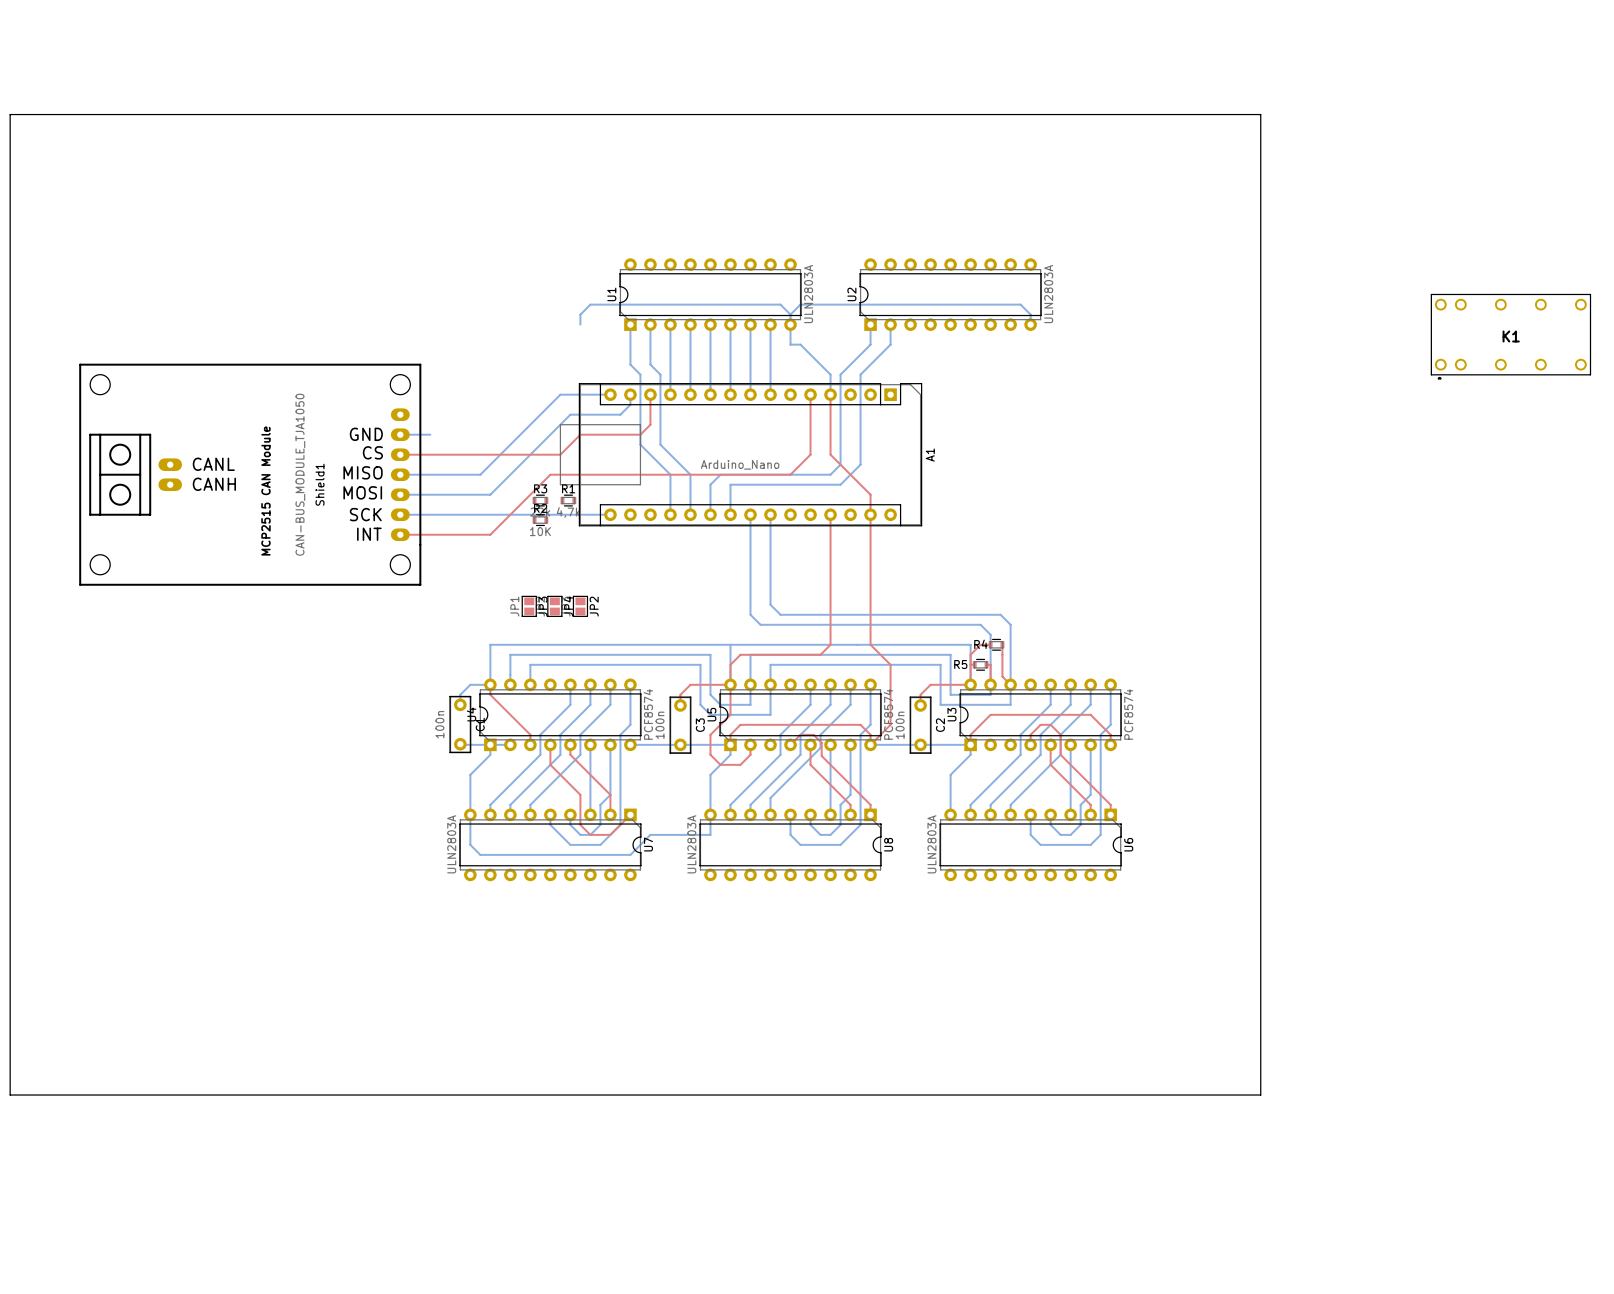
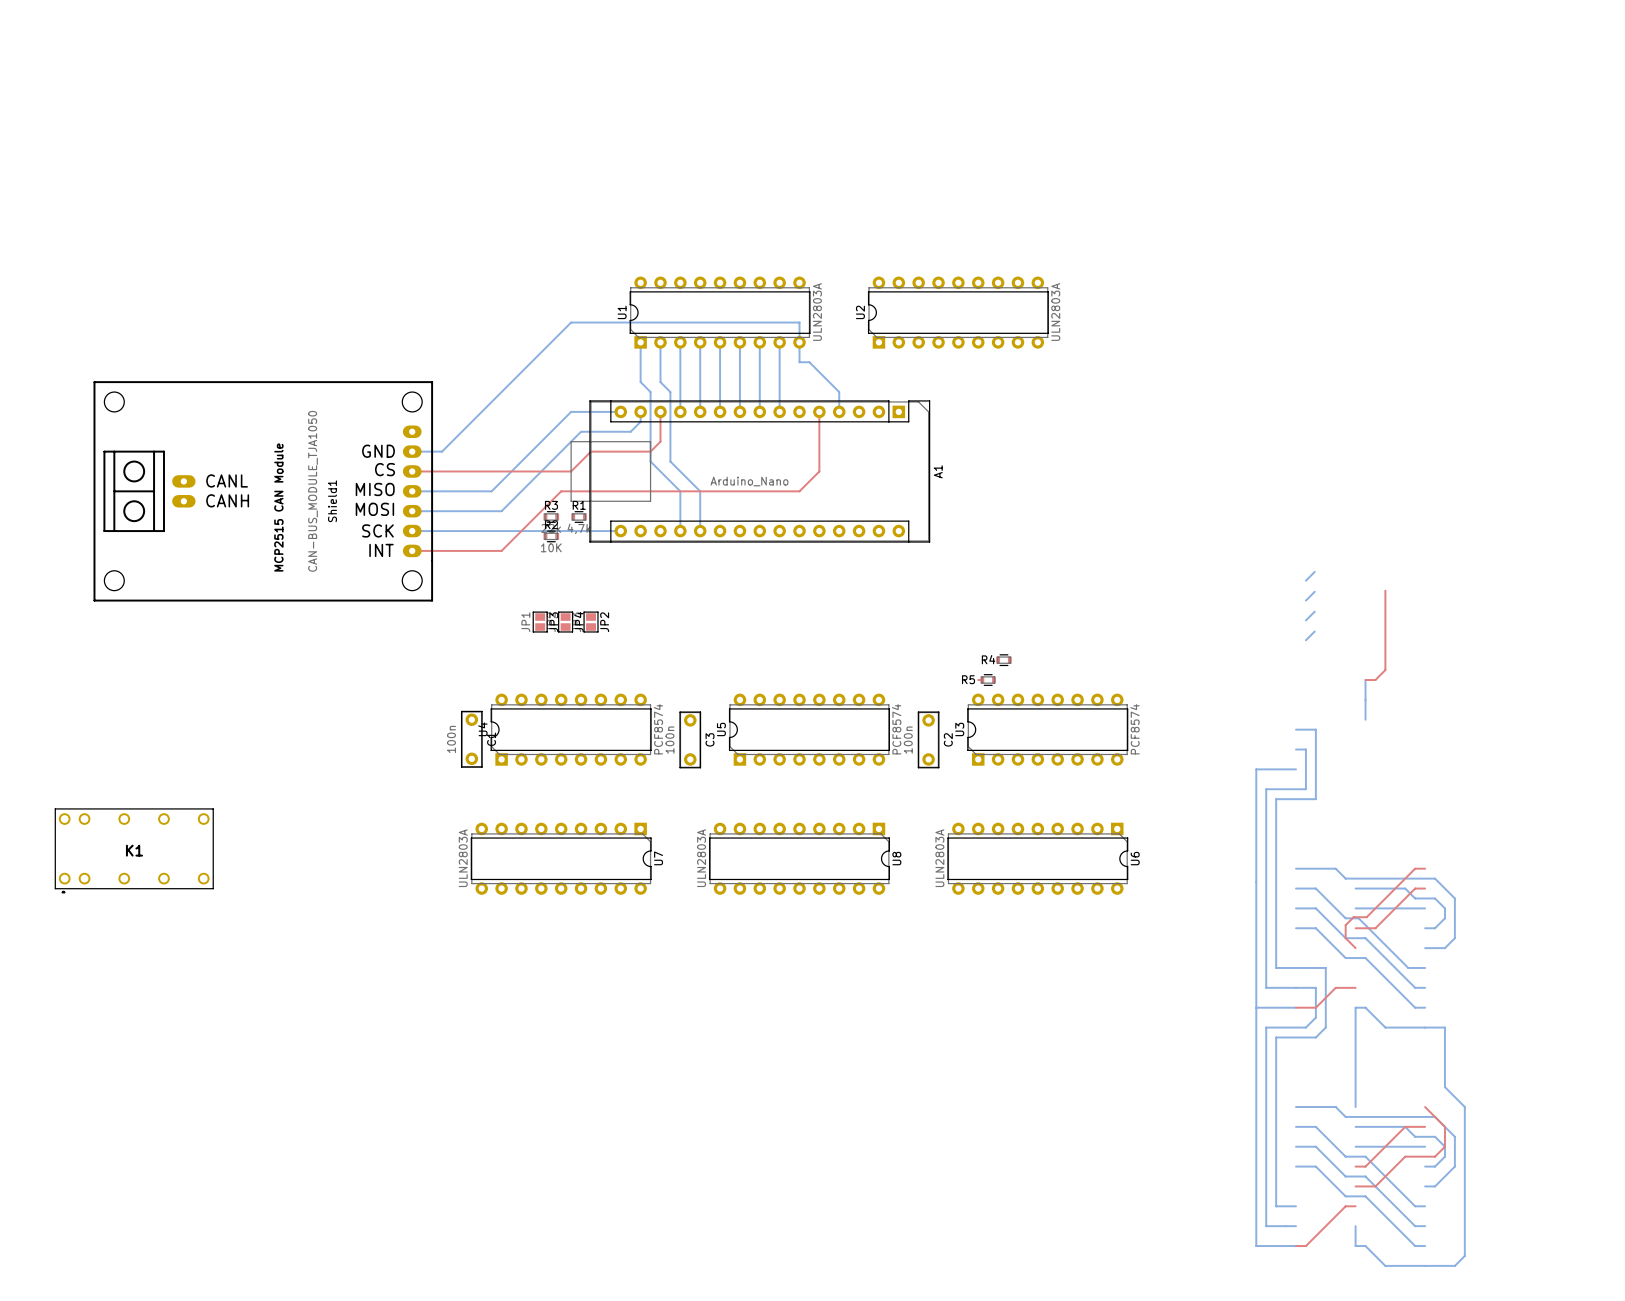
board edge: (10, 114) (10, 1095) (1260, 1095) (1260, 114) (10, 114) -> none
bottom track: (590, 304) (580, 314) (580, 324) -> (600, 322) (571, 322) (442, 451)
bottom track: (780, 304) (790, 314) (800, 304) (1020, 304) (1030, 314) (1030, 324) -> (789, 322) (799, 322) (799, 332)
bottom track: (870, 324) (870, 344) (840, 374) (840, 464) (830, 474) (720, 474) (710, 484) (710, 514) -> none
bottom track: (890, 324) (890, 344) (860, 374) (860, 464) (840, 484) (730, 484) (730, 514) -> none
K1 position: (1510, 336) -> (134, 851)
top track: (830, 394) (830, 454) (870, 494) (870, 644) (890, 664) (890, 724) (870, 744) (870, 734) (860, 724) (740, 724) (730, 734) (730, 744) -> none
bottom track: (750, 514) (750, 614) (760, 624) (980, 624) (990, 634) (990, 694) (950, 694) (950, 654) (750, 654) (750, 704) (720, 704) (710, 694) (710, 654) (510, 654) (510, 684) -> none
bottom track: (770, 514) (770, 604) (780, 614) (1000, 614) (1010, 624) (1010, 704) (940, 704) (940, 664) (770, 664) (770, 714) (710, 714) (700, 704) (700, 664) (530, 664) (530, 684) -> none
top track: (830, 514) (830, 644) (820, 654) (740, 654) (730, 664) (730, 714) (710, 734) (710, 754) (720, 764) (740, 764) (750, 754) (750, 744) -> none
bottom track: none -> (1314, 571) (1305, 580)
top track: none -> (1385, 590) (1385, 670) (1375, 680) (1365, 680)
bottom track: none -> (1314, 591) (1305, 600)
bottom track: none -> (1314, 611) (1305, 620)
bottom track: none -> (1314, 631) (1305, 640)
bottom track: (730, 644) (730, 684) -> none
top track: (990, 644) (980, 644) (970, 654) (970, 684) (930, 684) (920, 694) (920, 705) -> none
top track: (1002, 644) (1002, 676) (1010, 684) -> none
top track: (986, 664) (990, 664) (990, 684) -> none
bottom track: none -> (1365, 680) (1365, 719)
top track: (490, 684) (490, 694) (530, 734) (530, 744) -> none
bottom track: (570, 684) (570, 704) (540, 734) (540, 754) (490, 804) (490, 814) -> none
bottom track: (590, 684) (590, 704) (560, 734) (560, 754) (510, 804) (510, 814) -> none
bottom track: (610, 684) (610, 704) (580, 734) (580, 754) (530, 804) (530, 814) -> none
bottom track: (630, 684) (630, 724) (620, 734) (620, 824) (600, 844) (570, 844) (550, 824) (550, 814) -> none
top track: (730, 684) (690, 684) (680, 694) (680, 705) -> none
bottom track: (810, 684) (810, 704) (780, 734) (780, 754) (730, 804) (730, 814) -> none
bottom track: (830, 684) (830, 704) (800, 734) (800, 754) (750, 804) (750, 814) -> none
bottom track: (850, 684) (850, 704) (820, 734) (820, 747) (770, 797) (770, 814) -> none
bottom track: (870, 684) (870, 724) (860, 734) (860, 824) (840, 844) (800, 844) (790, 834) (790, 814) -> none
bottom track: (970, 684) (970, 644) (490, 644) (490, 684) (470, 684) (460, 694) (460, 704) -> none
bottom track: (1050, 684) (1050, 704) (1020, 734) (1020, 754) (970, 804) (970, 814) -> none
bottom track: (1070, 684) (1070, 704) (1040, 734) (1040, 754) (990, 804) (990, 814) -> none
bottom track: (1090, 684) (1090, 704) (1060, 734) (1060, 754) (1010, 804) (1010, 814) -> none
bottom track: (1110, 684) (1110, 724) (1100, 734) (1100, 834) (1090, 844) (1040, 844) (1030, 834) (1030, 814) -> none
bottom track: none -> (1296, 729) (1315, 729) (1315, 799) (1276, 799) (1276, 967) (1325, 967) (1325, 1027) (1315, 1037) (1276, 1037) (1276, 1206) (1296, 1206)
bottom track: none -> (1296, 749) (1305, 749) (1305, 789) (1266, 789) (1266, 987) (1315, 987) (1315, 1017) (1305, 1027) (1266, 1027) (1266, 1226) (1296, 1226)
bottom track: (460, 744) (510, 744) -> none
bottom track: (489, 744) (490, 754) (470, 774) (470, 844) (480, 854) (630, 854) (650, 834) (710, 834) (710, 774) (730, 754) (730, 744) (630, 744) -> none
top track: (550, 744) (550, 764) (580, 794) (580, 824) (590, 834) (610, 834) (630, 814) -> none
top track: (570, 744) (570, 754) (610, 794) (610, 814) -> none
bottom track: (590, 744) (590, 814) -> none
bottom track: (610, 744) (610, 794) (600, 804) (600, 824) (590, 834) (580, 834) (570, 824) (570, 814) -> none
top track: (790, 744) (800, 734) (813, 734) (821, 742) (821, 755) (870, 804) (870, 814) -> none
top track: (810, 744) (810, 764) (850, 804) (850, 814) -> none
bottom track: (830, 744) (830, 814) -> none
bottom track: (850, 744) (850, 794) (840, 804) (840, 824) (830, 834) (820, 834) (810, 824) (810, 814) -> none
bottom track: (870, 744) (970, 744) (970, 754) (950, 774) (950, 814) -> none
top track: (970, 744) (970, 734) (990, 714) (1090, 714) (1110, 734) (1110, 744) -> none
top track: (1030, 744) (1030, 734) (1040, 724) (1050, 724) (1060, 734) (1060, 754) (1110, 804) (1110, 814) -> none
top track: (1050, 744) (1050, 764) (1090, 804) (1090, 814) -> none
bottom track: (1070, 744) (1070, 814) -> none
bottom track: (1090, 744) (1090, 794) (1080, 804) (1080, 824) (1070, 834) (1060, 834) (1050, 824) (1050, 814) -> none
bottom track: none -> (1296, 769) (1256, 769) (1256, 1246) (1296, 1246)
bottom track: none -> (1296, 868) (1335, 868) (1345, 878) (1435, 878) (1454, 898) (1454, 938) (1444, 948) (1425, 948)
top track: none -> (1425, 868) (1415, 868) (1366, 917) (1353, 917) (1345, 925) (1345, 938) (1355, 948)
bottom track: none -> (1296, 888) (1315, 888) (1345, 918) (1358, 918) (1408, 967) (1425, 967)
bottom track: none -> (1355, 888) (1405, 888) (1415, 898) (1435, 898) (1444, 908) (1444, 918) (1435, 928) (1425, 928)
top track: none -> (1425, 888) (1415, 888) (1375, 928) (1355, 928)
bottom track: none -> (1296, 908) (1315, 908) (1345, 938) (1365, 938) (1415, 987) (1425, 987)
bottom track: none -> (1355, 908) (1425, 908)
bottom track: none -> (1296, 928) (1315, 928) (1345, 958) (1365, 958) (1415, 1007) (1425, 1007)
top track: none -> (1355, 987) (1335, 987) (1315, 1007) (1296, 1007)
bottom track: none -> (1256, 1007) (1296, 1007)
bottom track: none -> (1296, 1107) (1335, 1107) (1345, 1116) (1435, 1116) (1454, 1136) (1454, 1166) (1435, 1186) (1425, 1186)
bottom track: none -> (1355, 1107) (1355, 1007) (1365, 1007) (1385, 1027) (1444, 1027) (1444, 1087) (1464, 1107) (1464, 1255) (1454, 1265) (1385, 1265) (1365, 1246) (1355, 1246) (1355, 1226)
top track: none -> (1425, 1107) (1444, 1126) (1444, 1146) (1435, 1156) (1405, 1156) (1375, 1186) (1355, 1186)
bottom track: none -> (1296, 1126) (1315, 1126) (1345, 1156) (1365, 1156) (1415, 1206) (1425, 1206)
bottom track: none -> (1355, 1126) (1405, 1126) (1415, 1136) (1435, 1136) (1444, 1146) (1444, 1156) (1435, 1166) (1425, 1166)
top track: none -> (1425, 1126) (1405, 1126) (1365, 1166) (1355, 1166)
bottom track: none -> (1296, 1146) (1315, 1146) (1345, 1176) (1365, 1176) (1415, 1226) (1425, 1226)
bottom track: none -> (1355, 1146) (1425, 1146)
bottom track: none -> (1296, 1166) (1315, 1166) (1345, 1196) (1365, 1196) (1415, 1246) (1425, 1246)
top track: none -> (1355, 1206) (1345, 1206) (1305, 1246) (1296, 1246)

